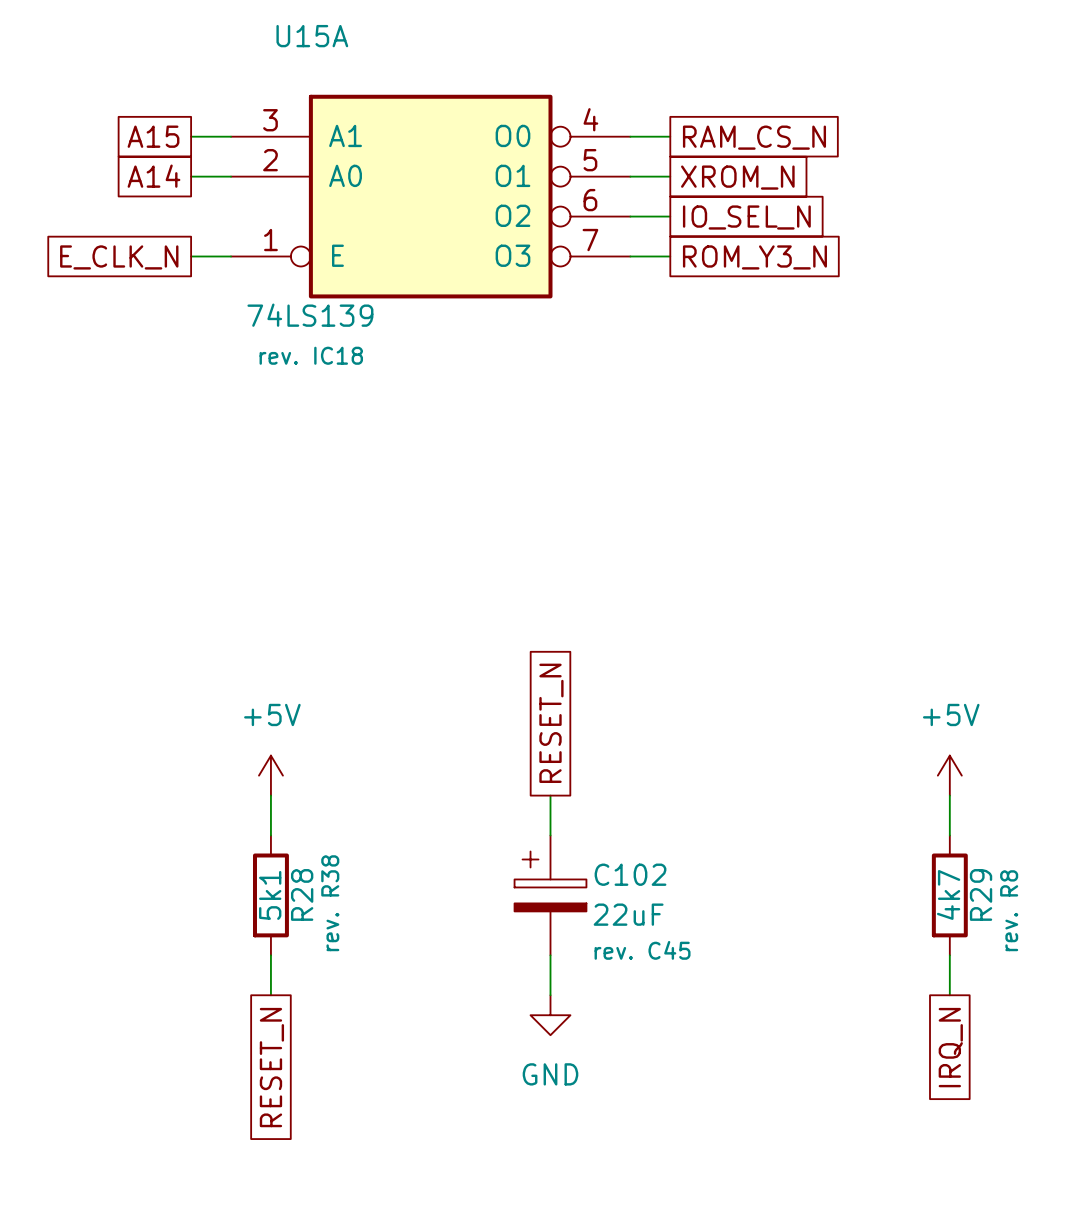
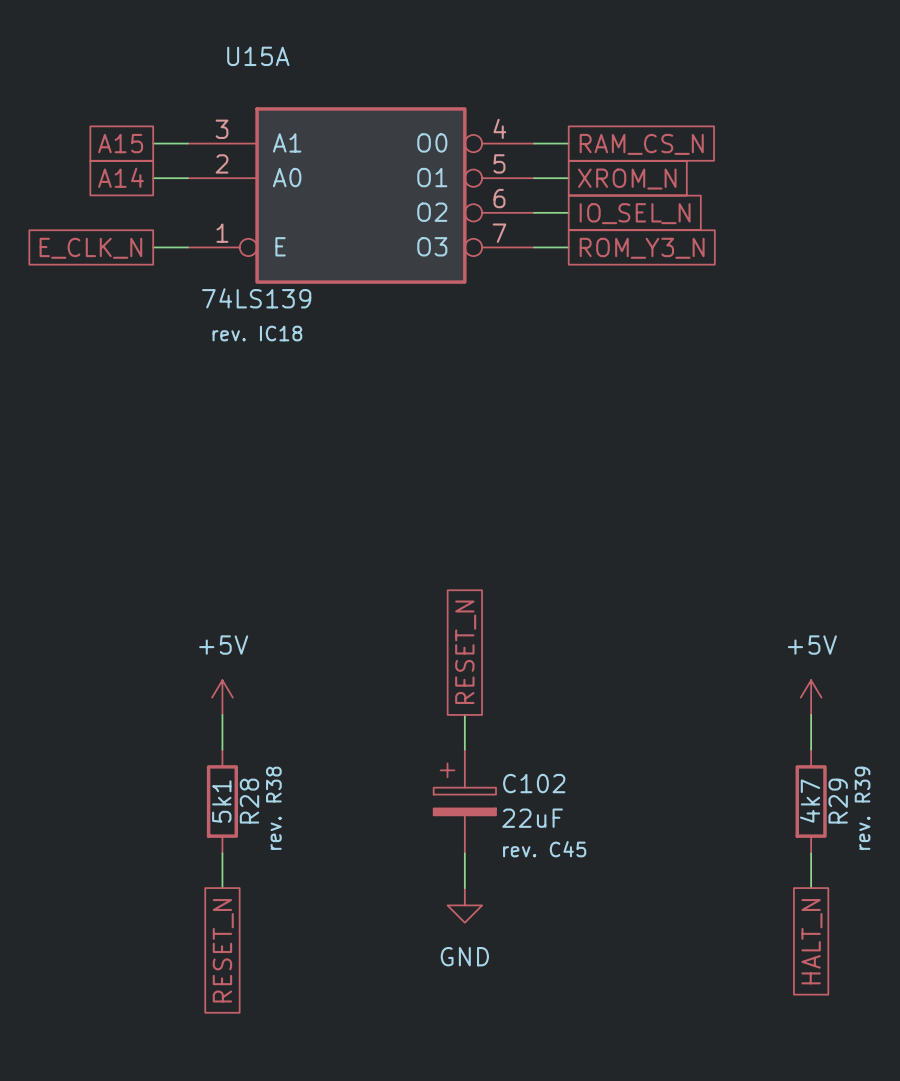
R29 text: rev. R8 (1009, 910) -> rev. R39 (862, 808)
global label: IRQ_N (950, 1047) -> HALT_N (811, 941)

